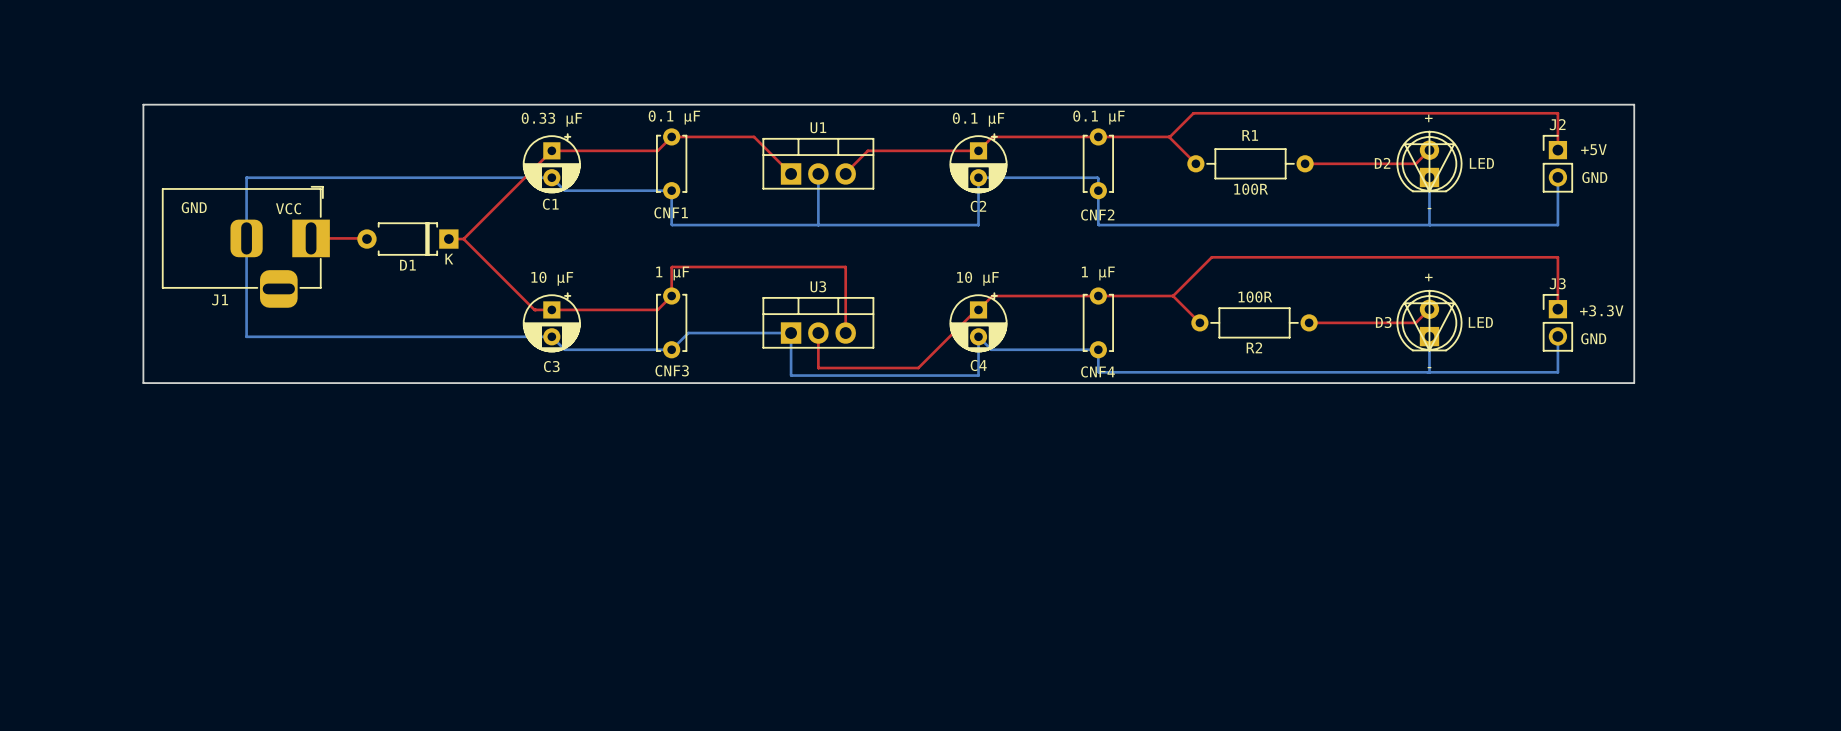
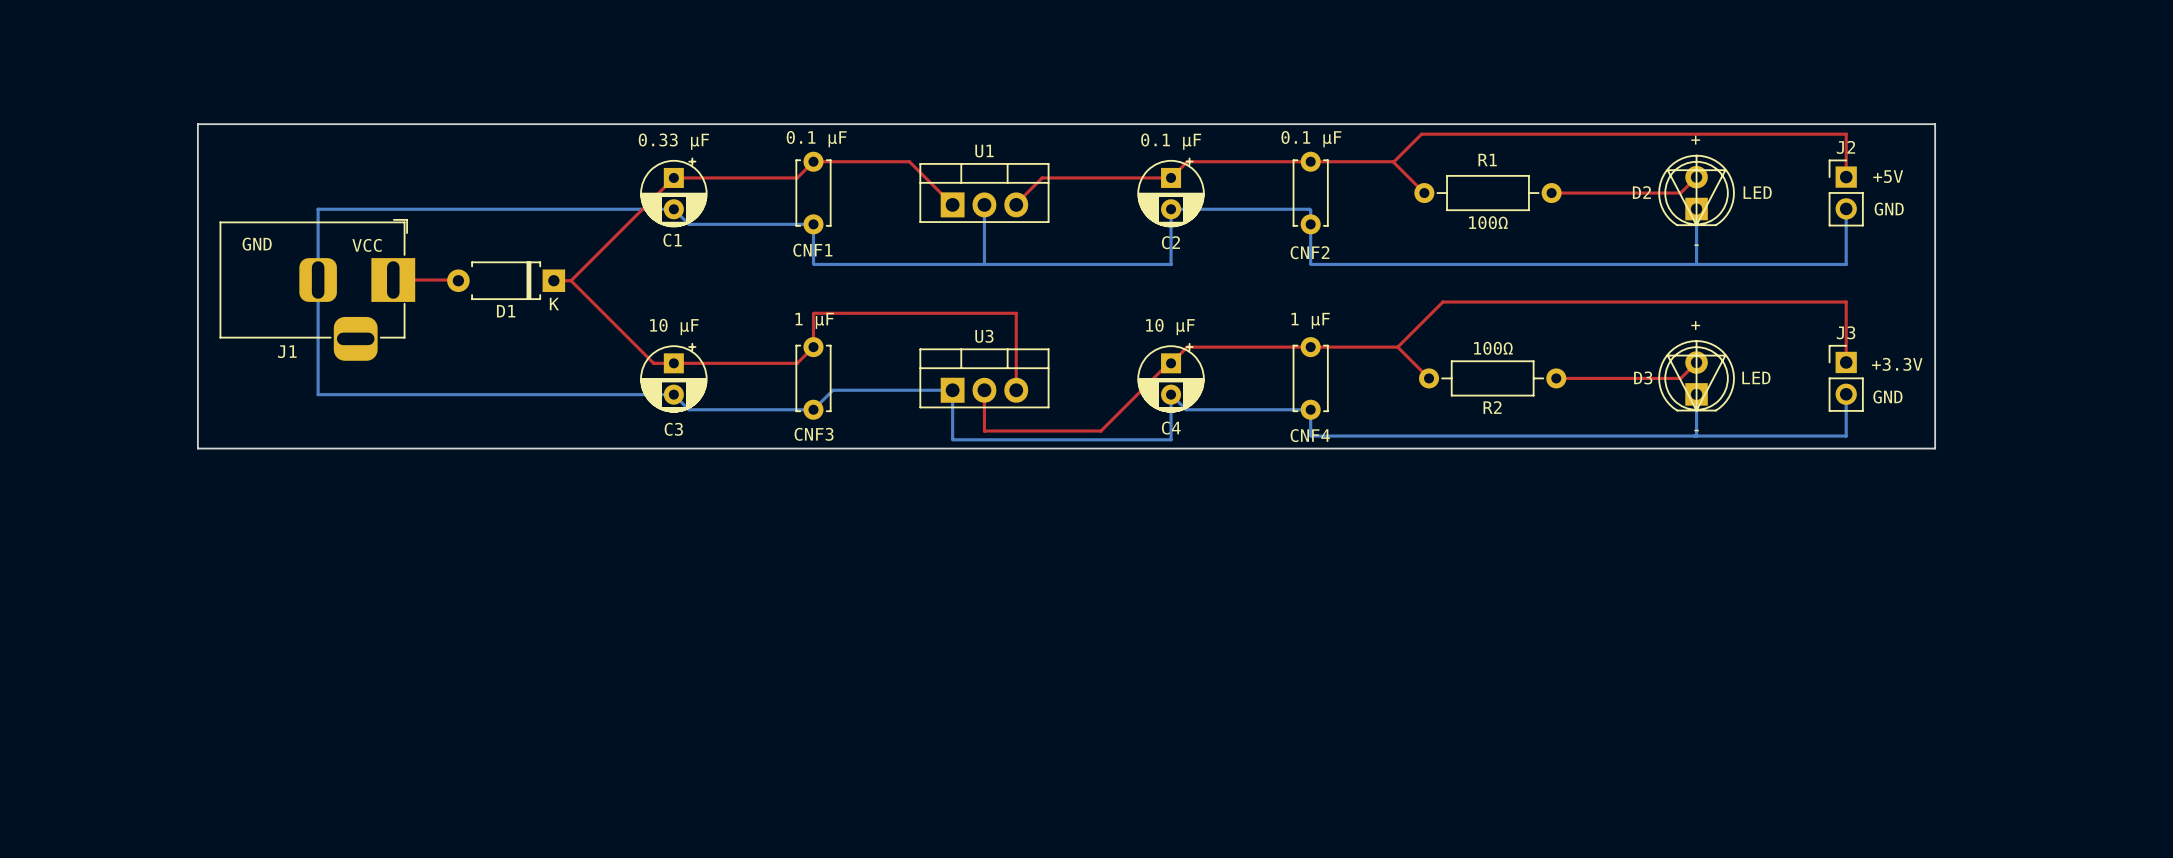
R1 value: 100R (1251, 189) -> 100Ω (1488, 222)
R2 value: 100R (1255, 297) -> 100Ω (1493, 348)

